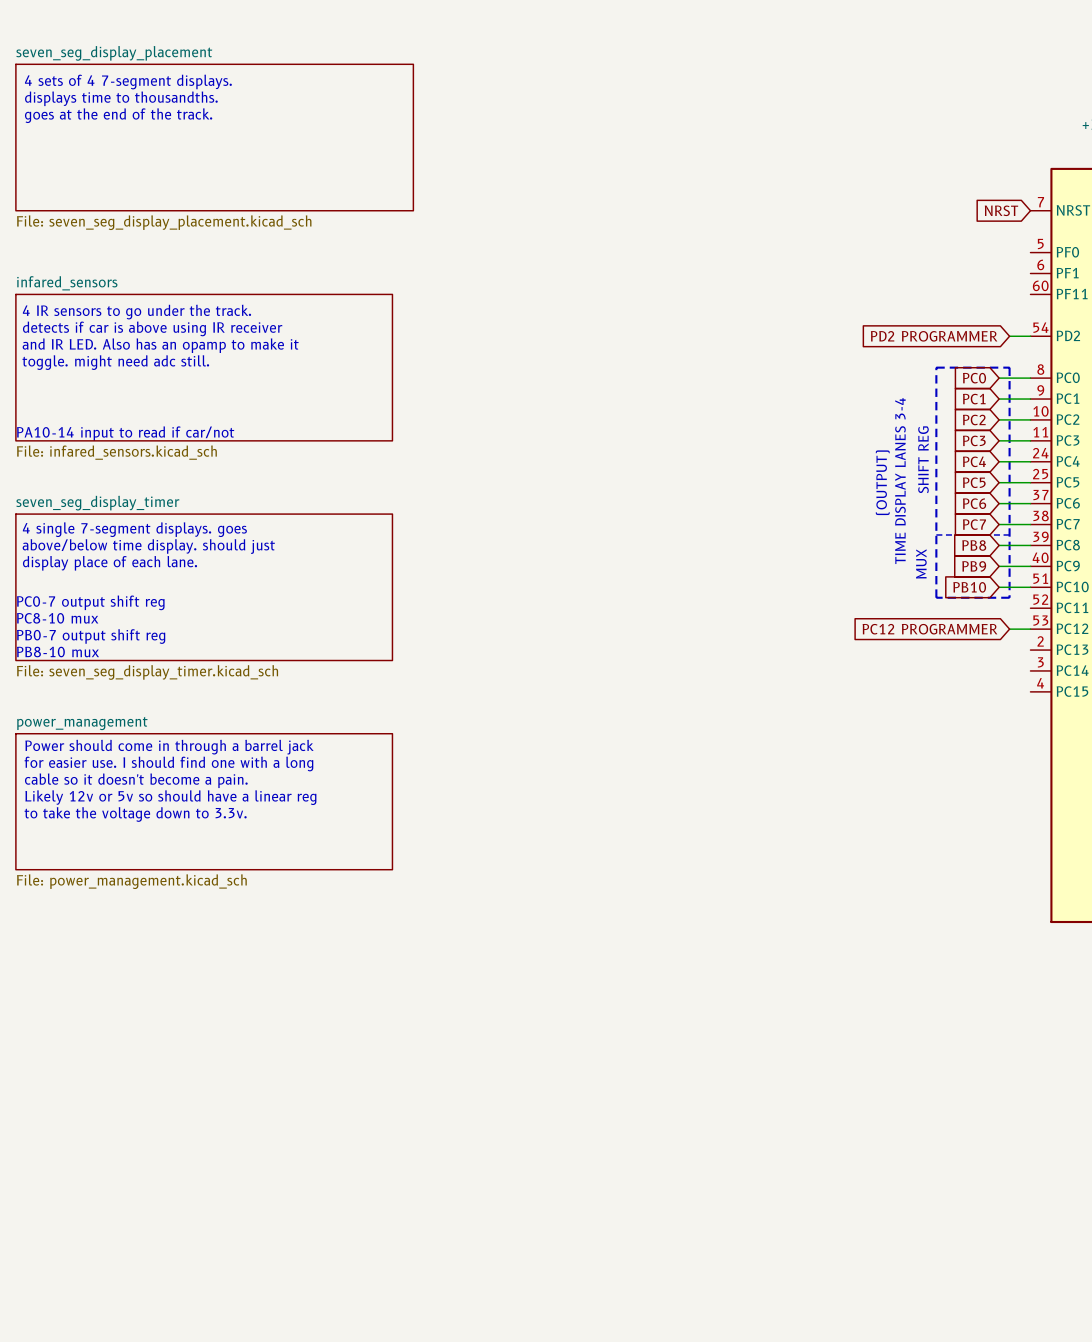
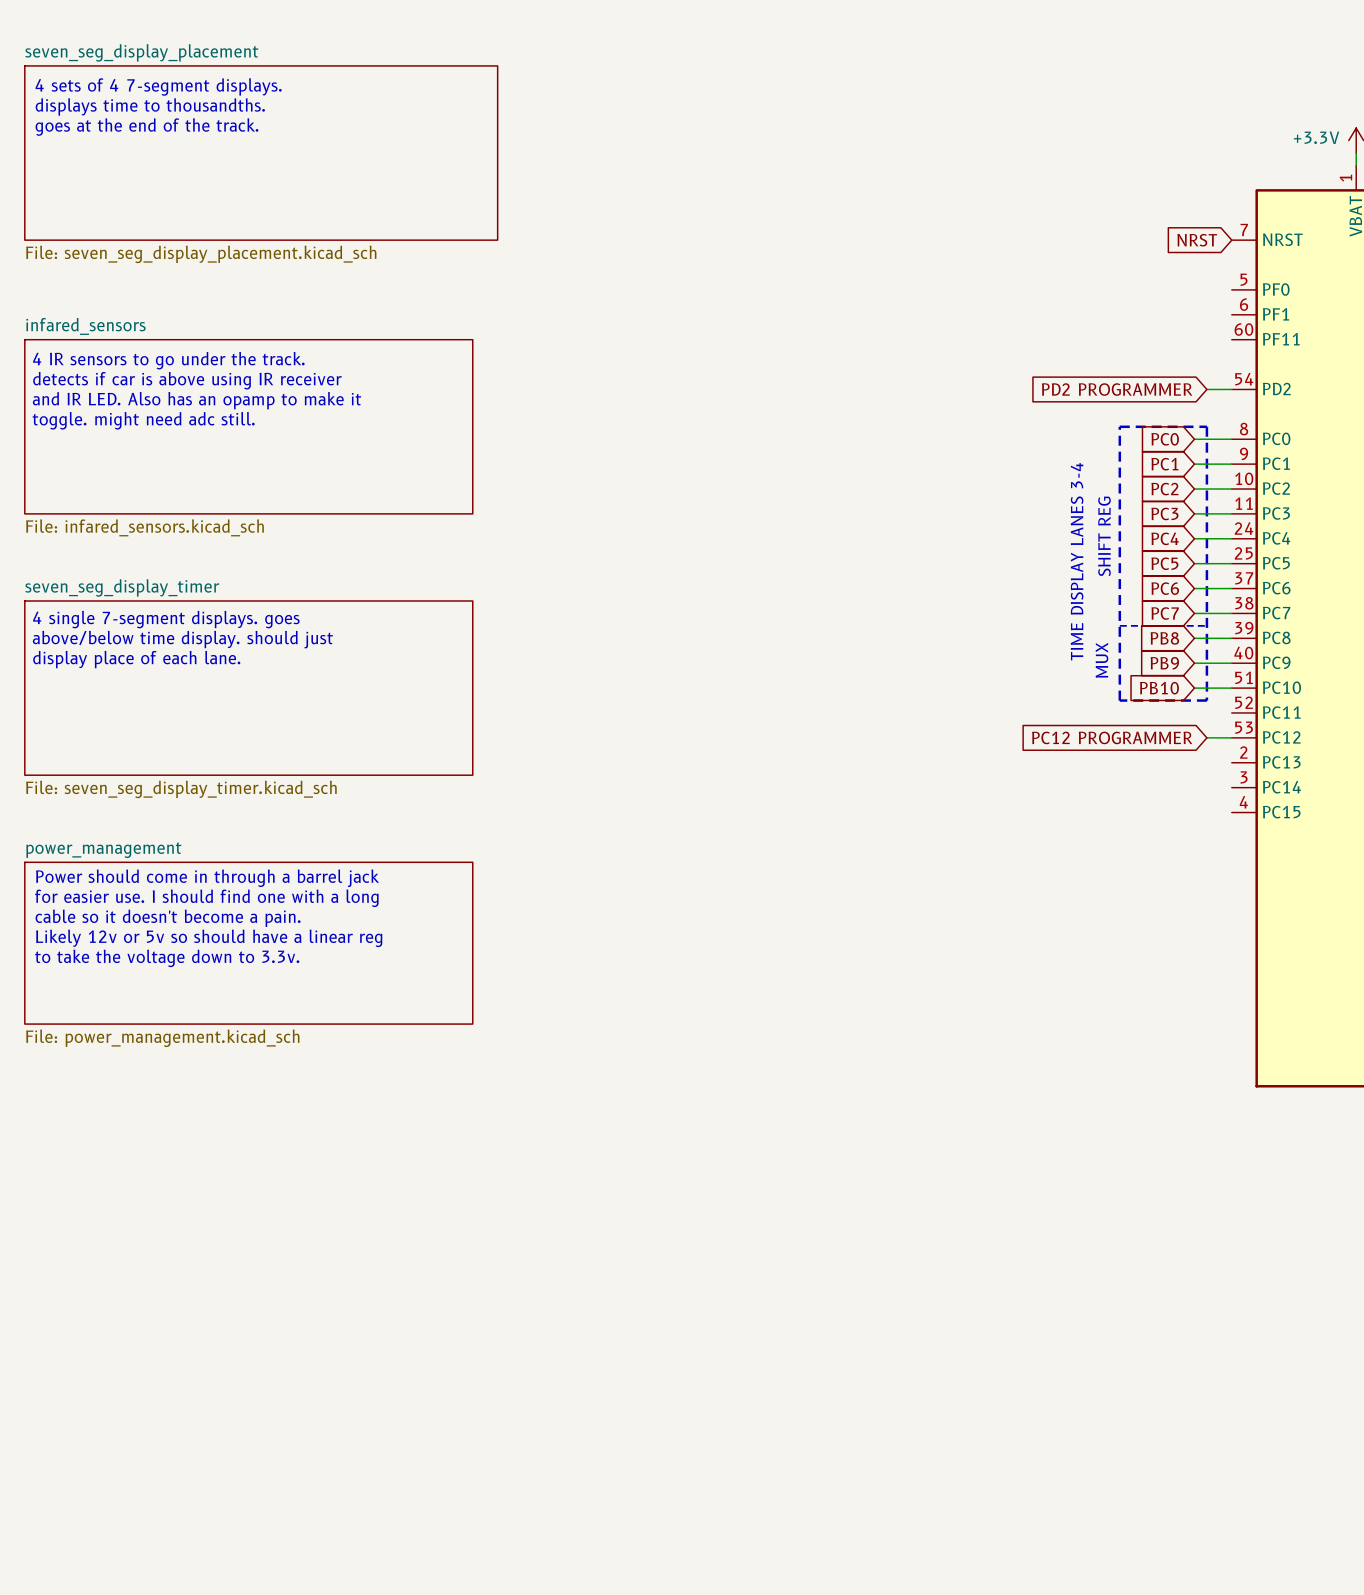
text: PA10-14 input to read if car/not (125, 433) -> none
text: (OUTPUT) (882, 482) -> none
text: PC0-7 output shift reg (90, 602) -> none
text: PC8-10 mux (57, 618) -> none
text: PB0-7 output shift reg (91, 636) -> none
text: PB8-10 mux (57, 652) -> none

